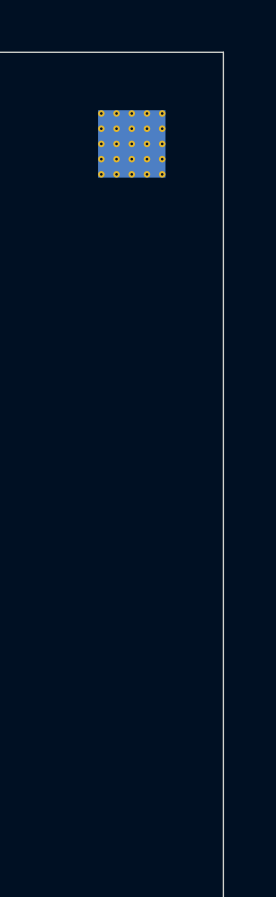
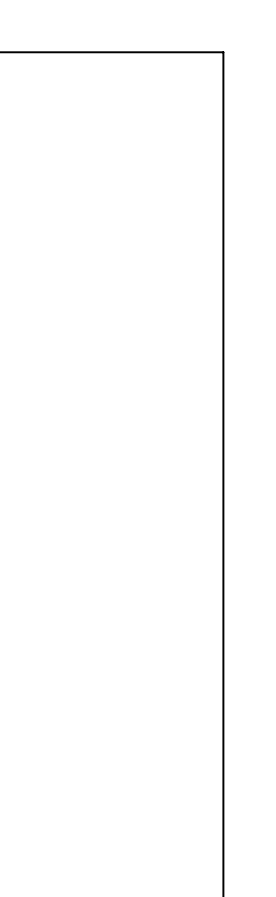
part: (131, 143) -> none

